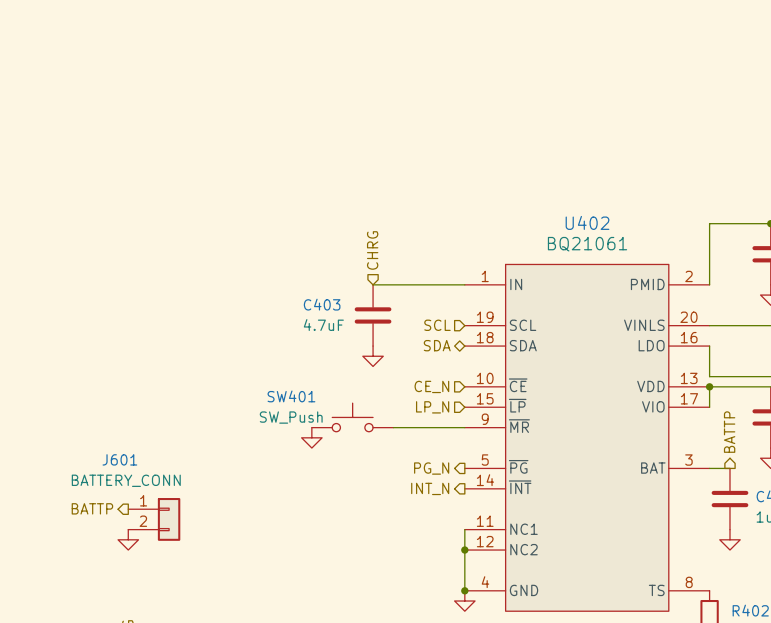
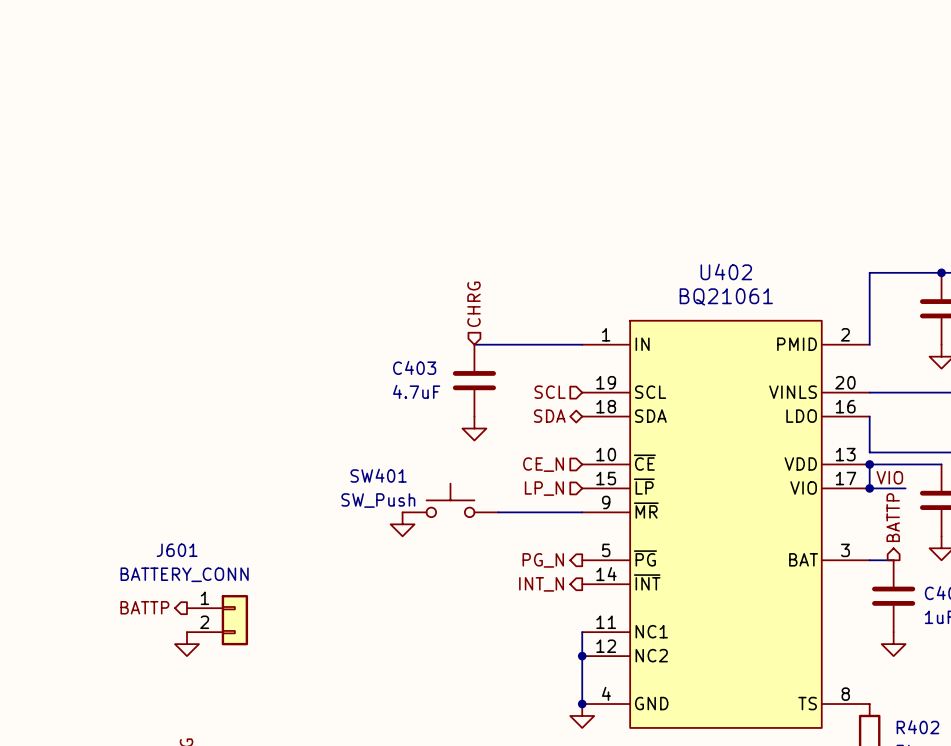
label: none -> VIO (889, 477)
wire: none -> (869, 488) (905, 488)
junction: none -> (869, 488)

